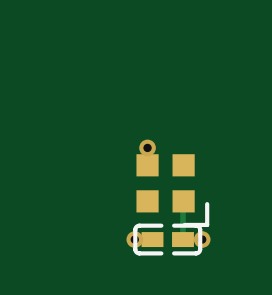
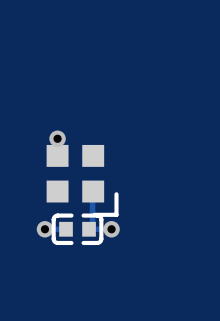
part footprint: [133, 223, 203, 256] -> [51, 213, 104, 246]

